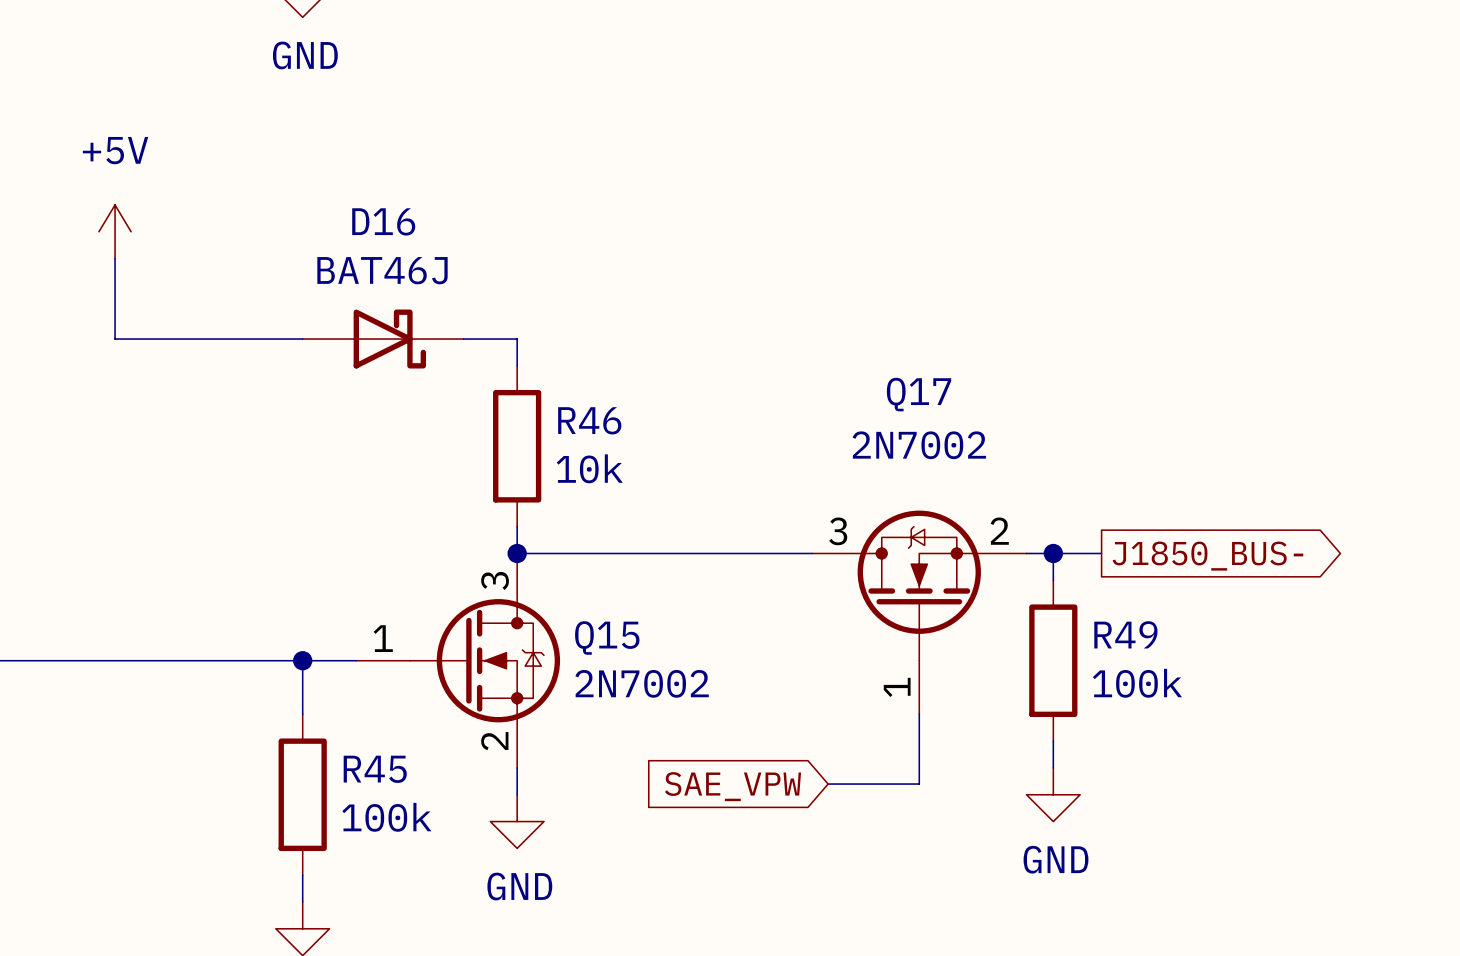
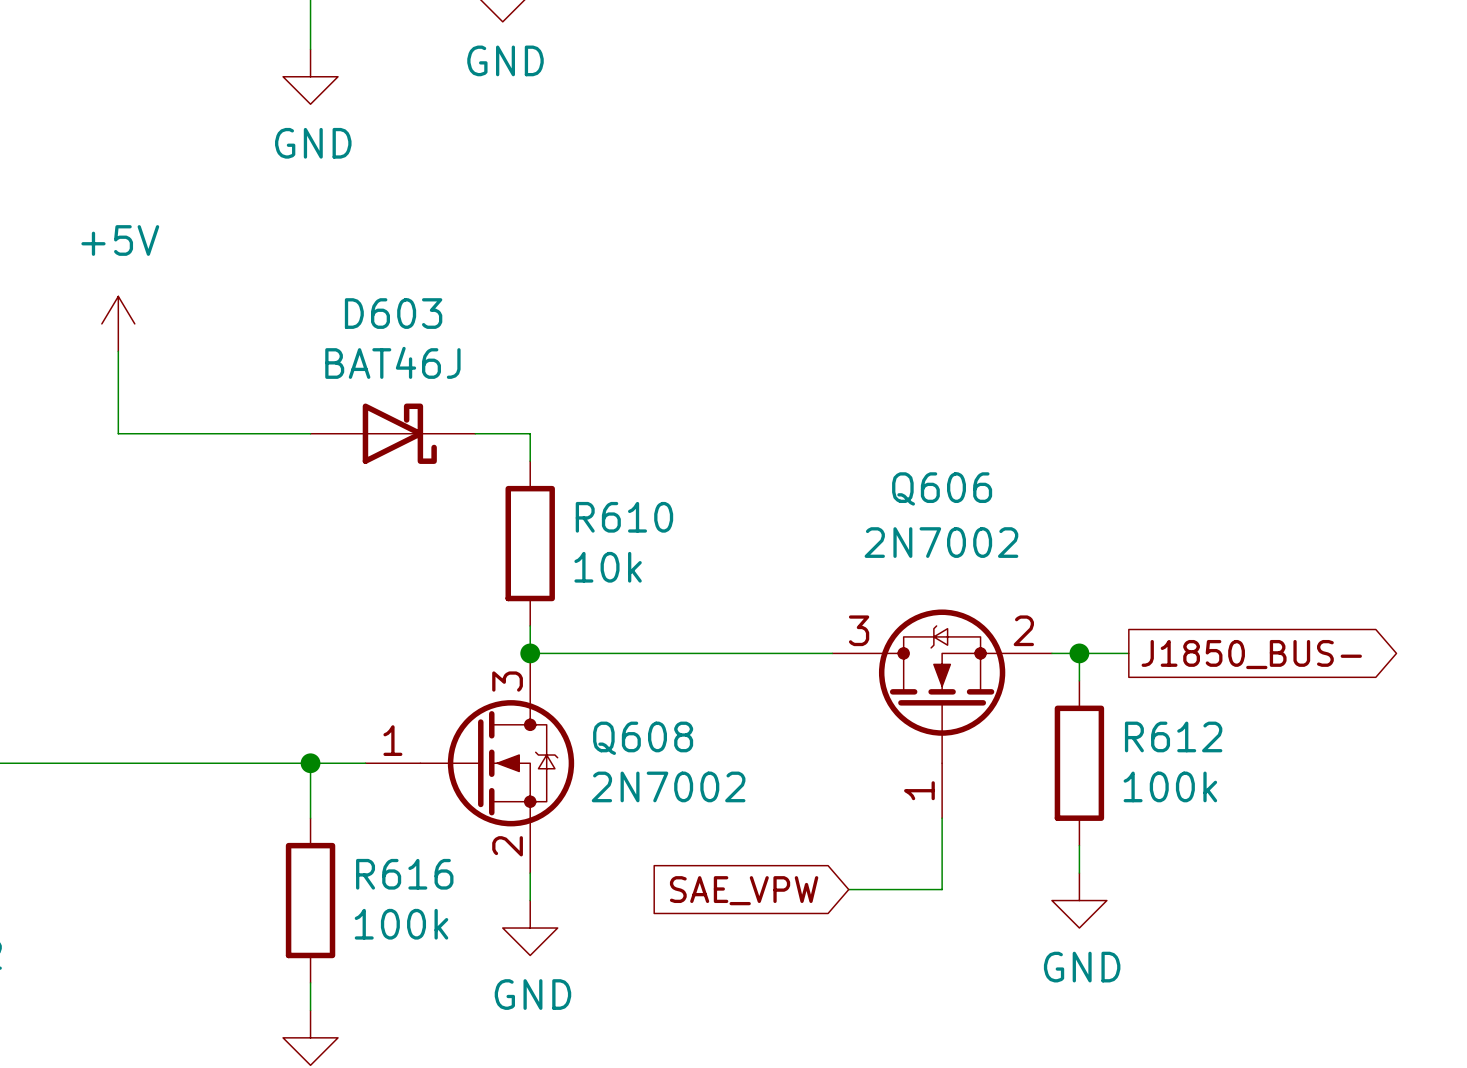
D16 name: D16 (383, 221) -> D603 (393, 313)
Q17 name: Q17 (919, 394) -> Q606 (942, 488)
R46 name: R46 (589, 420) -> R610 (624, 517)
R49 name: R49 (1125, 634) -> R612 (1173, 736)
Q15 name: Q15 (607, 637) -> Q608 (643, 738)
R45 name: R45 (375, 769) -> R616 (404, 874)

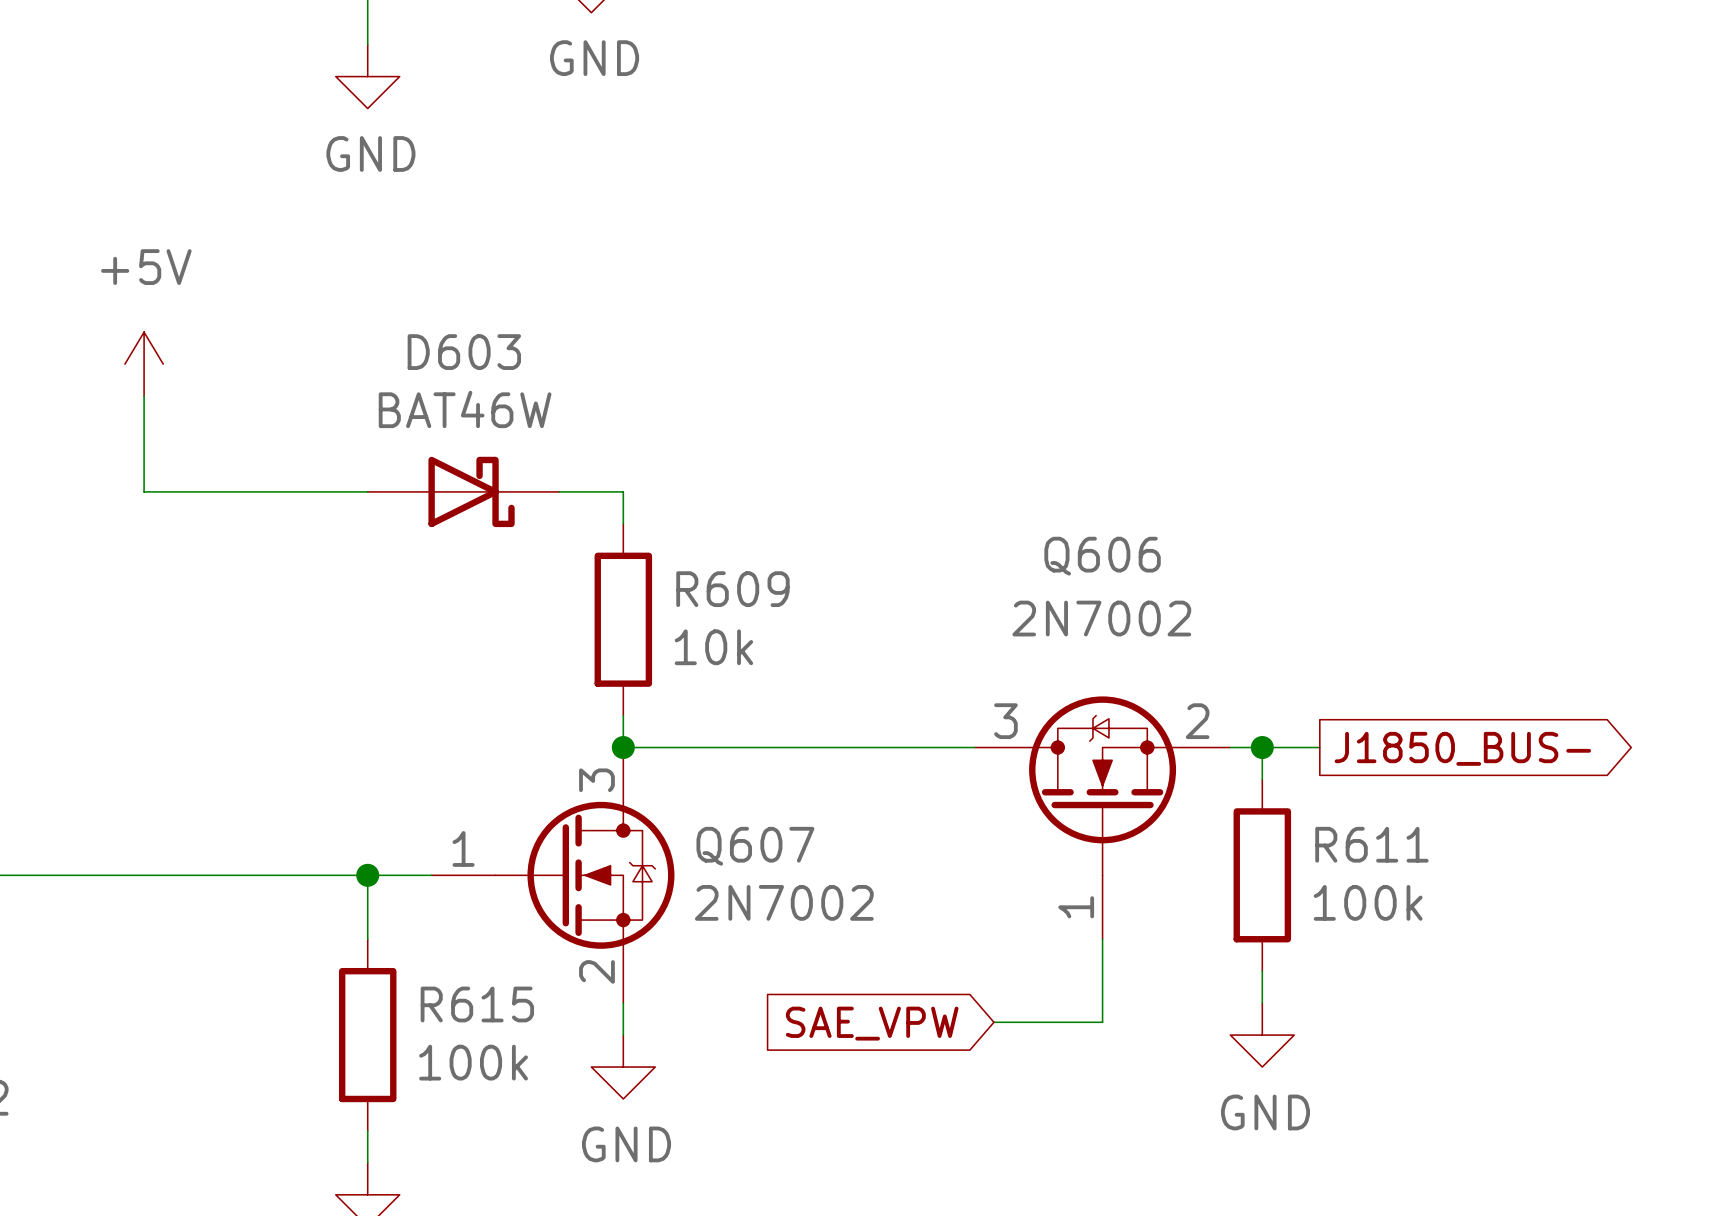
D603 value: BAT46J (392, 362) -> BAT46W (465, 409)
R610 name: R610 (624, 517) -> R609 (732, 589)
R612 name: R612 (1173, 736) -> R611 (1371, 844)
Q608 name: Q608 (643, 738) -> Q607 (755, 846)
R616 name: R616 (404, 874) -> R615 (477, 1004)

